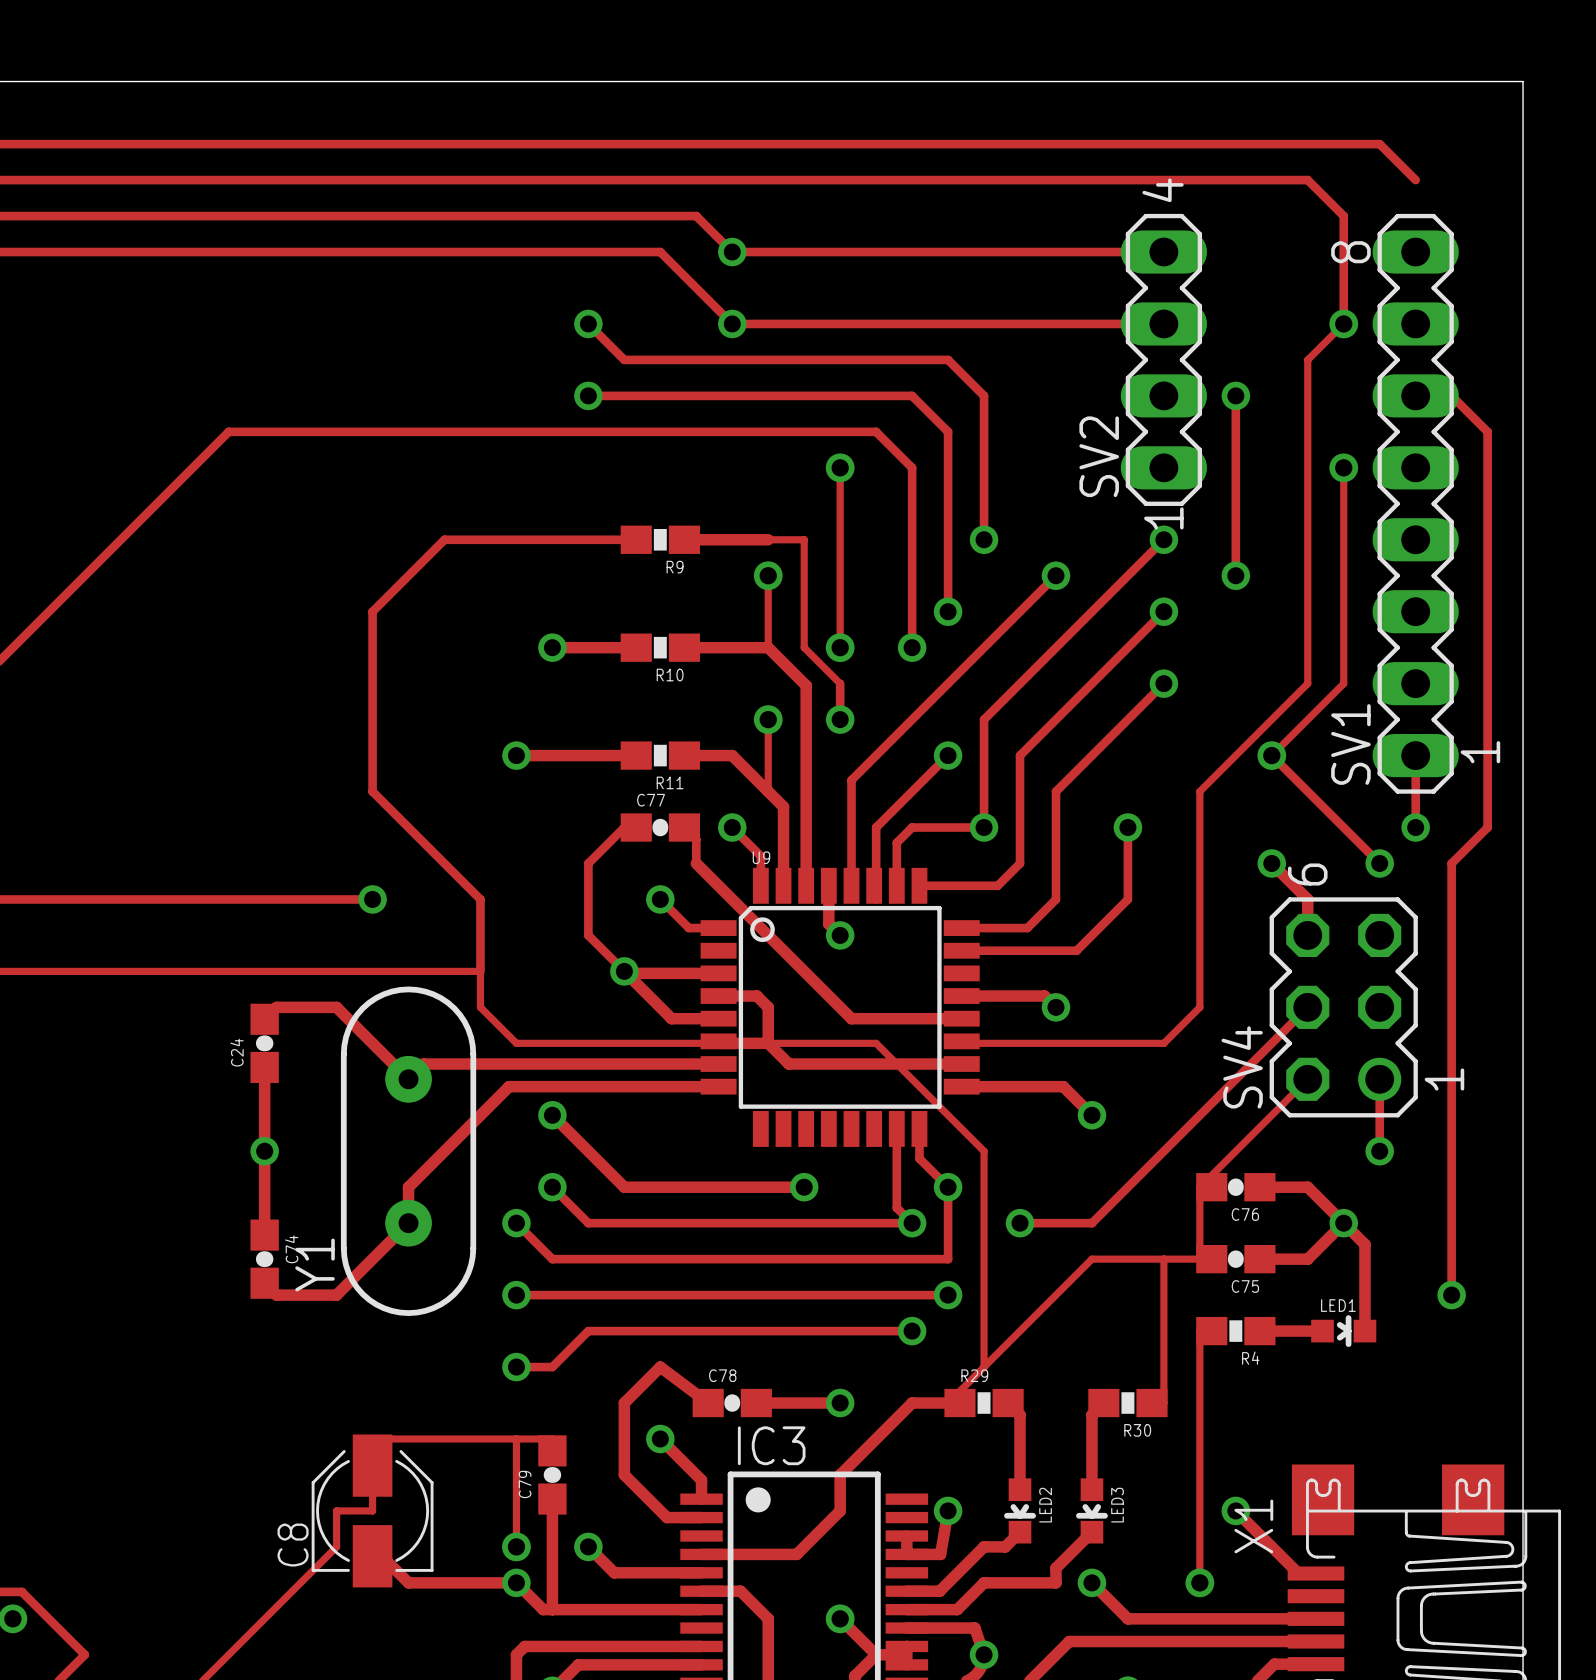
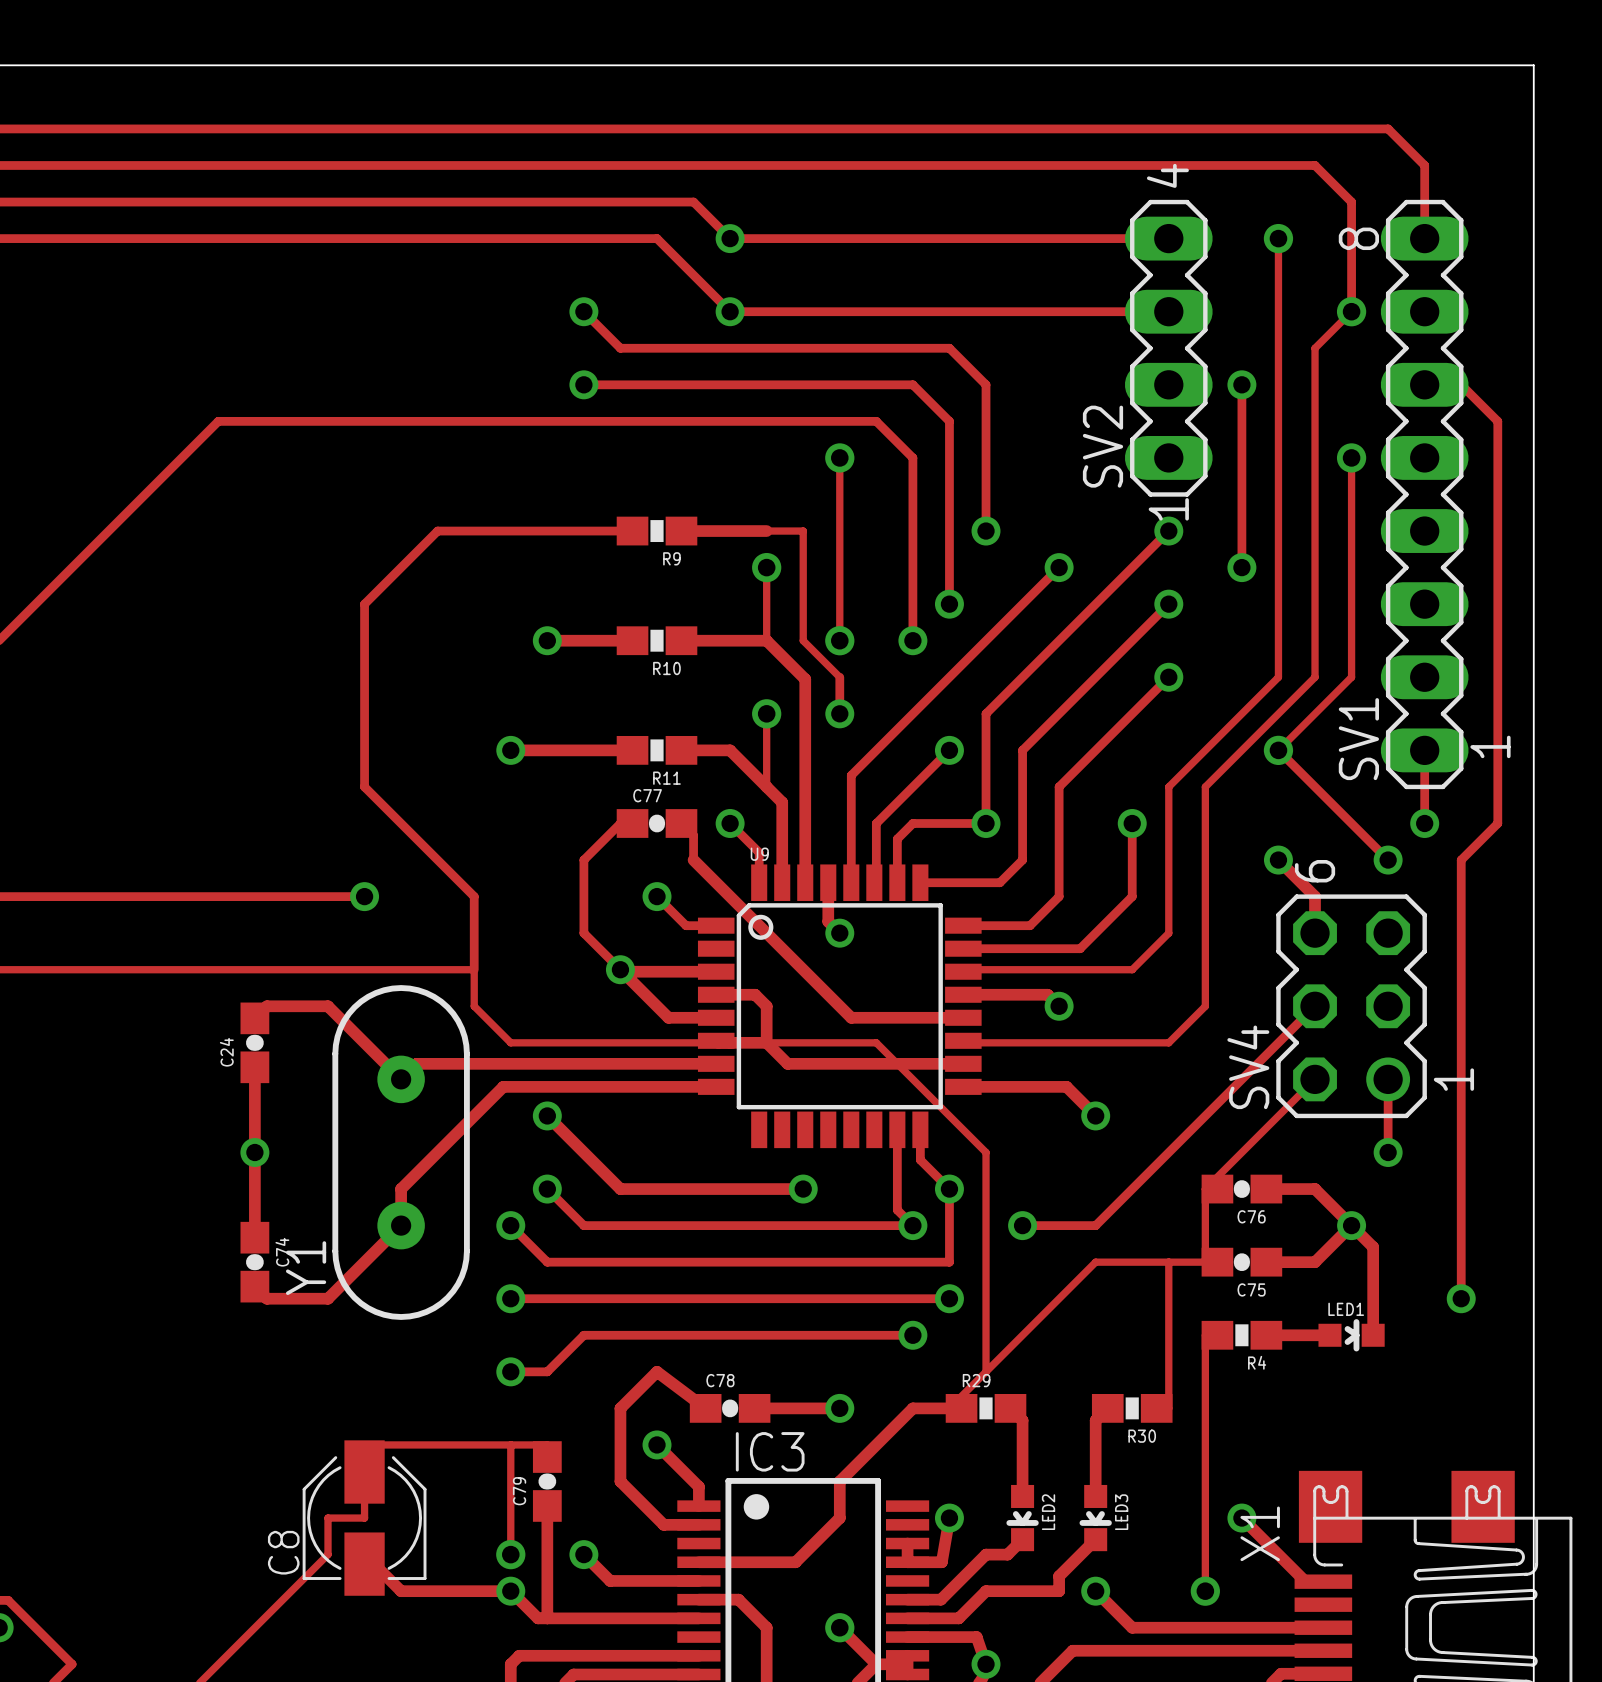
track: none -> (1424, 165) (1424, 238)
track: none -> (1278, 238) (1278, 677) (1168, 786) (1168, 933) (1132, 969) (949, 969) (963, 971)
via: none -> (1278, 238)

